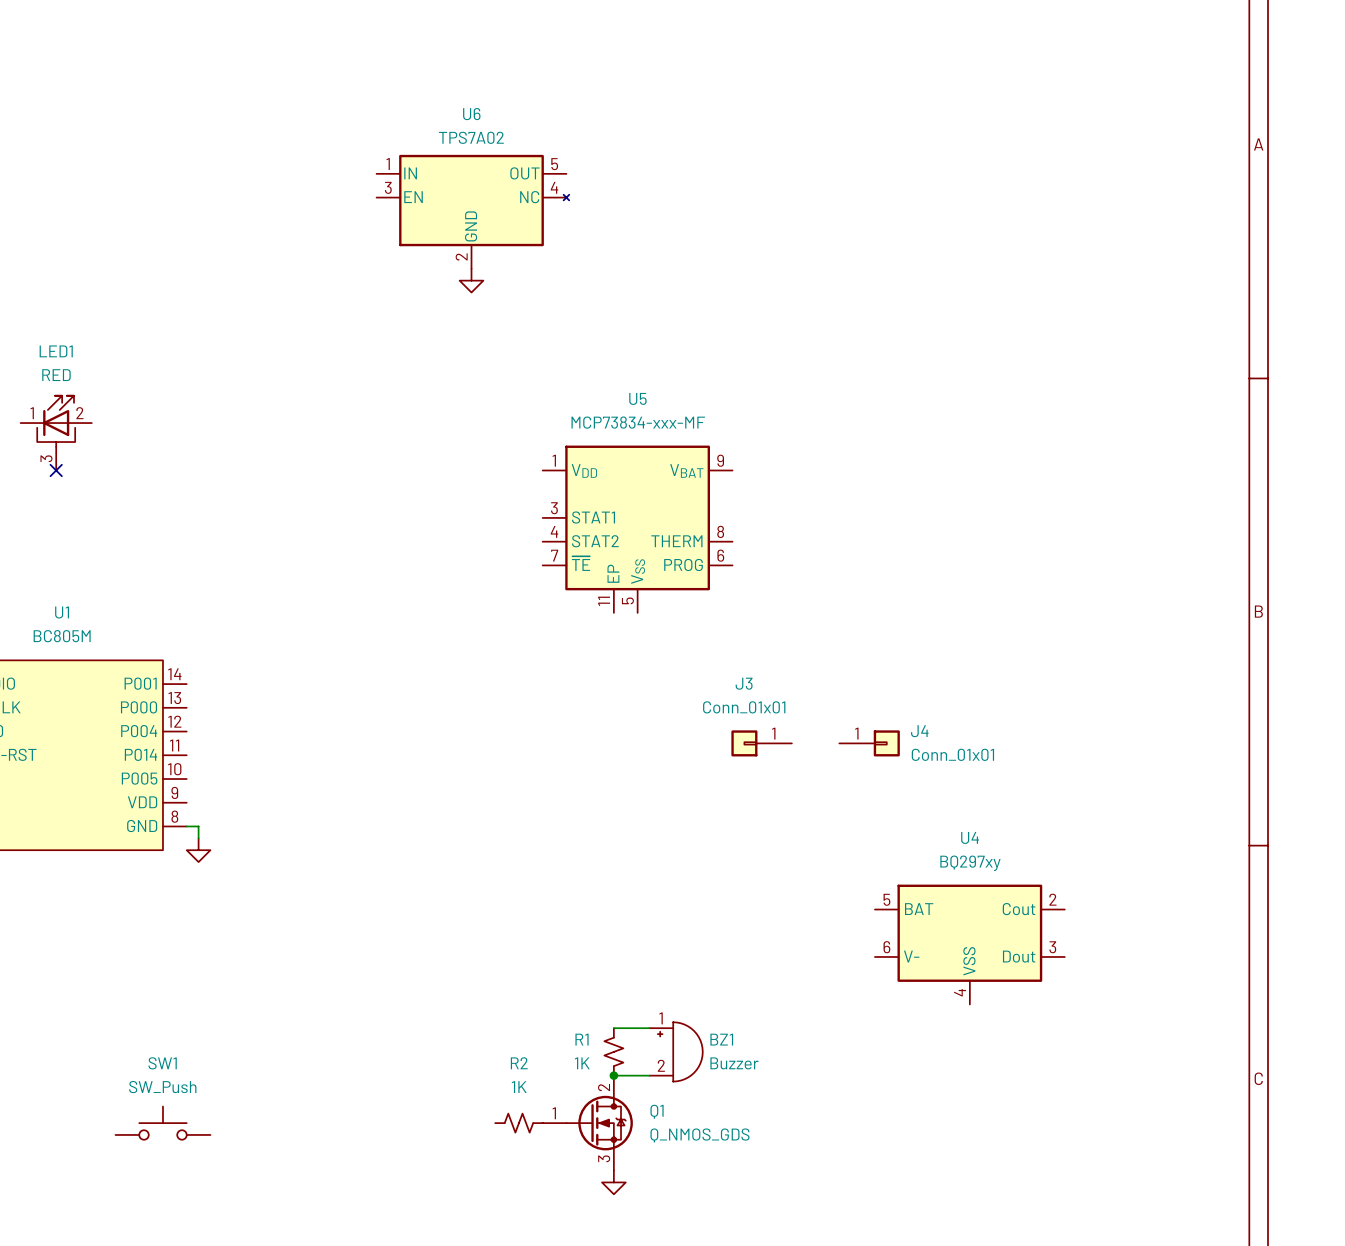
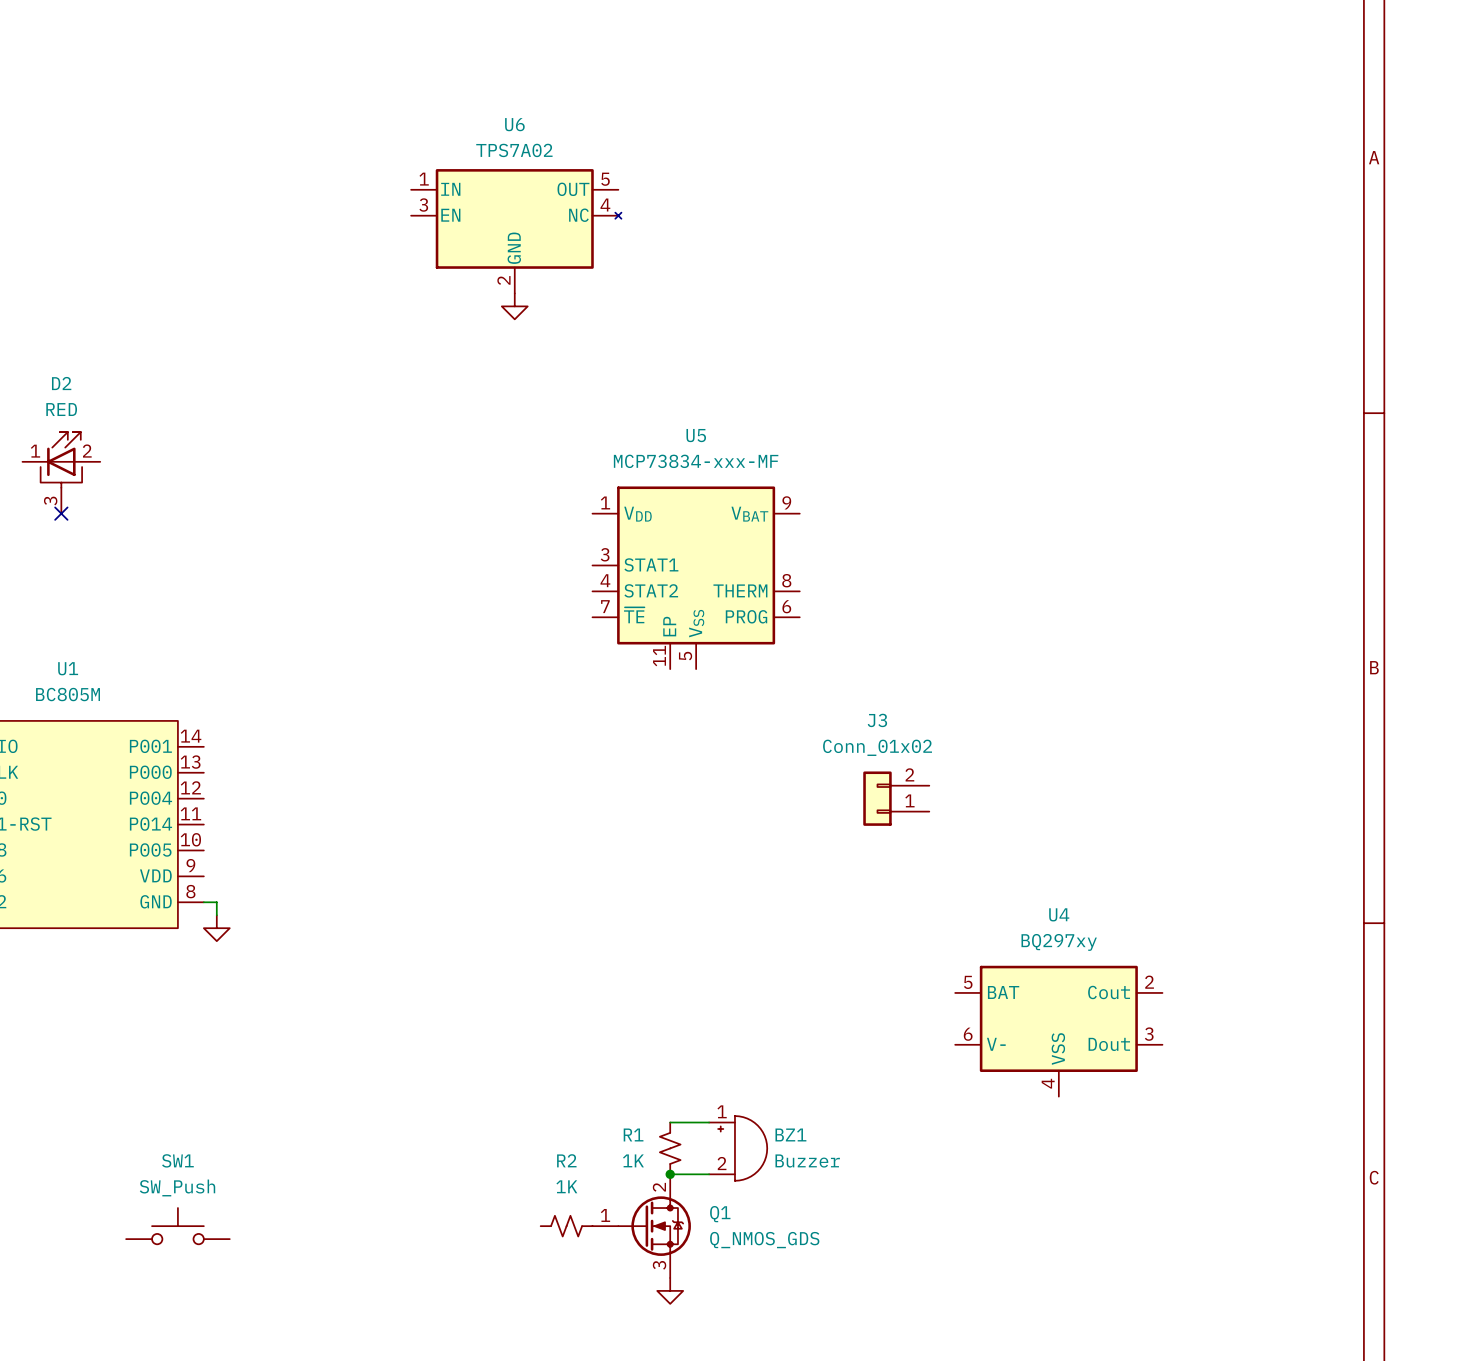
LED1 name: LED1 (56, 351) -> D2 (61, 383)
J3 value: Conn_01x01 (744, 707) -> Conn_01x02 (877, 747)
J3 symbol: [731, 730, 792, 757] -> [863, 771, 930, 826]
J4: Conn_01x01 (869, 743) -> none

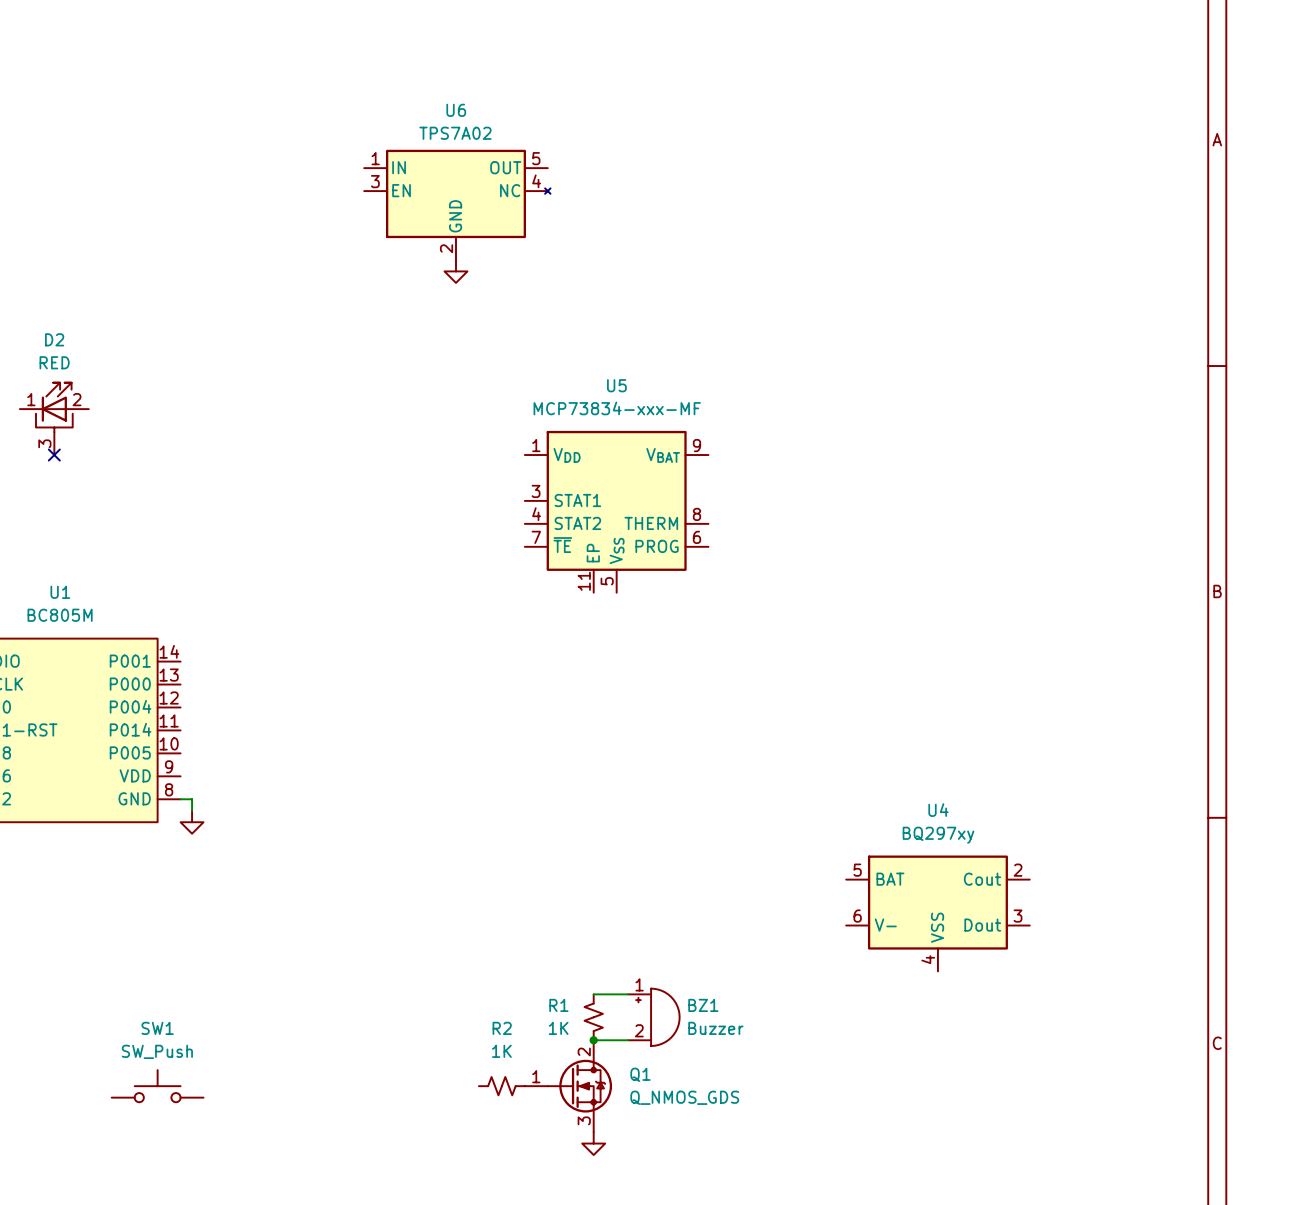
J3: Conn_01x02 (896, 798) -> none

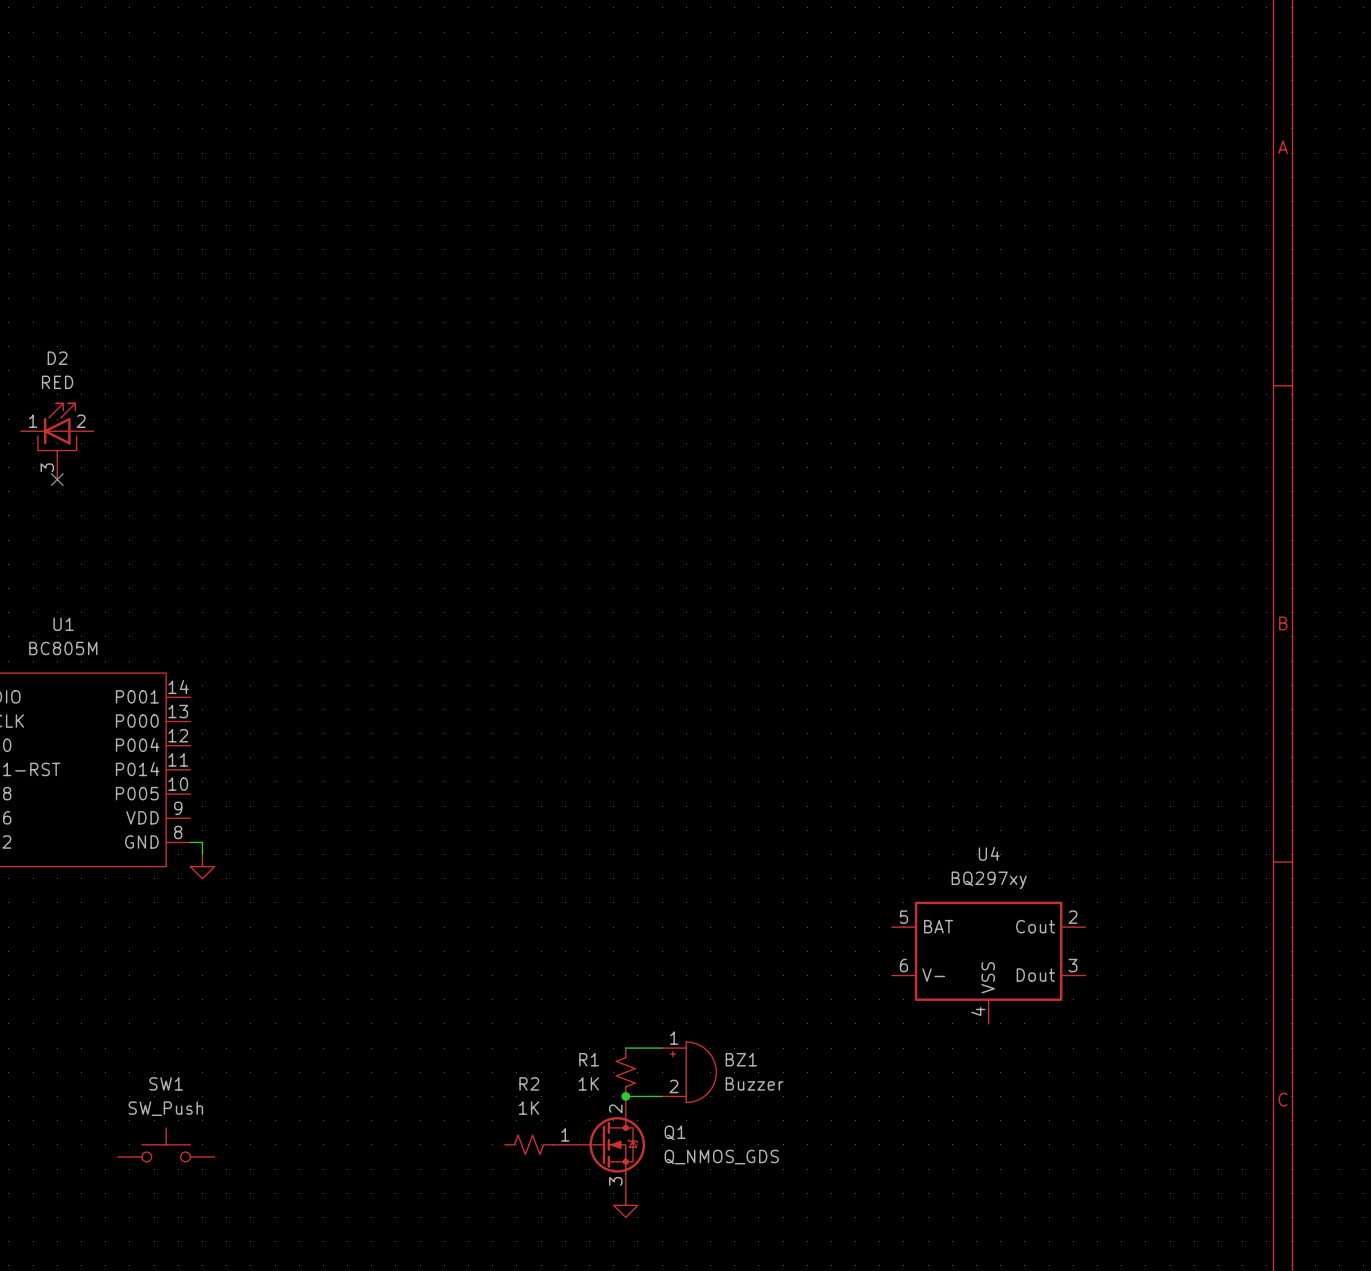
U6: TPS7A02 (457, 204) -> none
power symbol: (455, 271) -> none
U5: MCP73834-xxx-MF (616, 511) -> none

